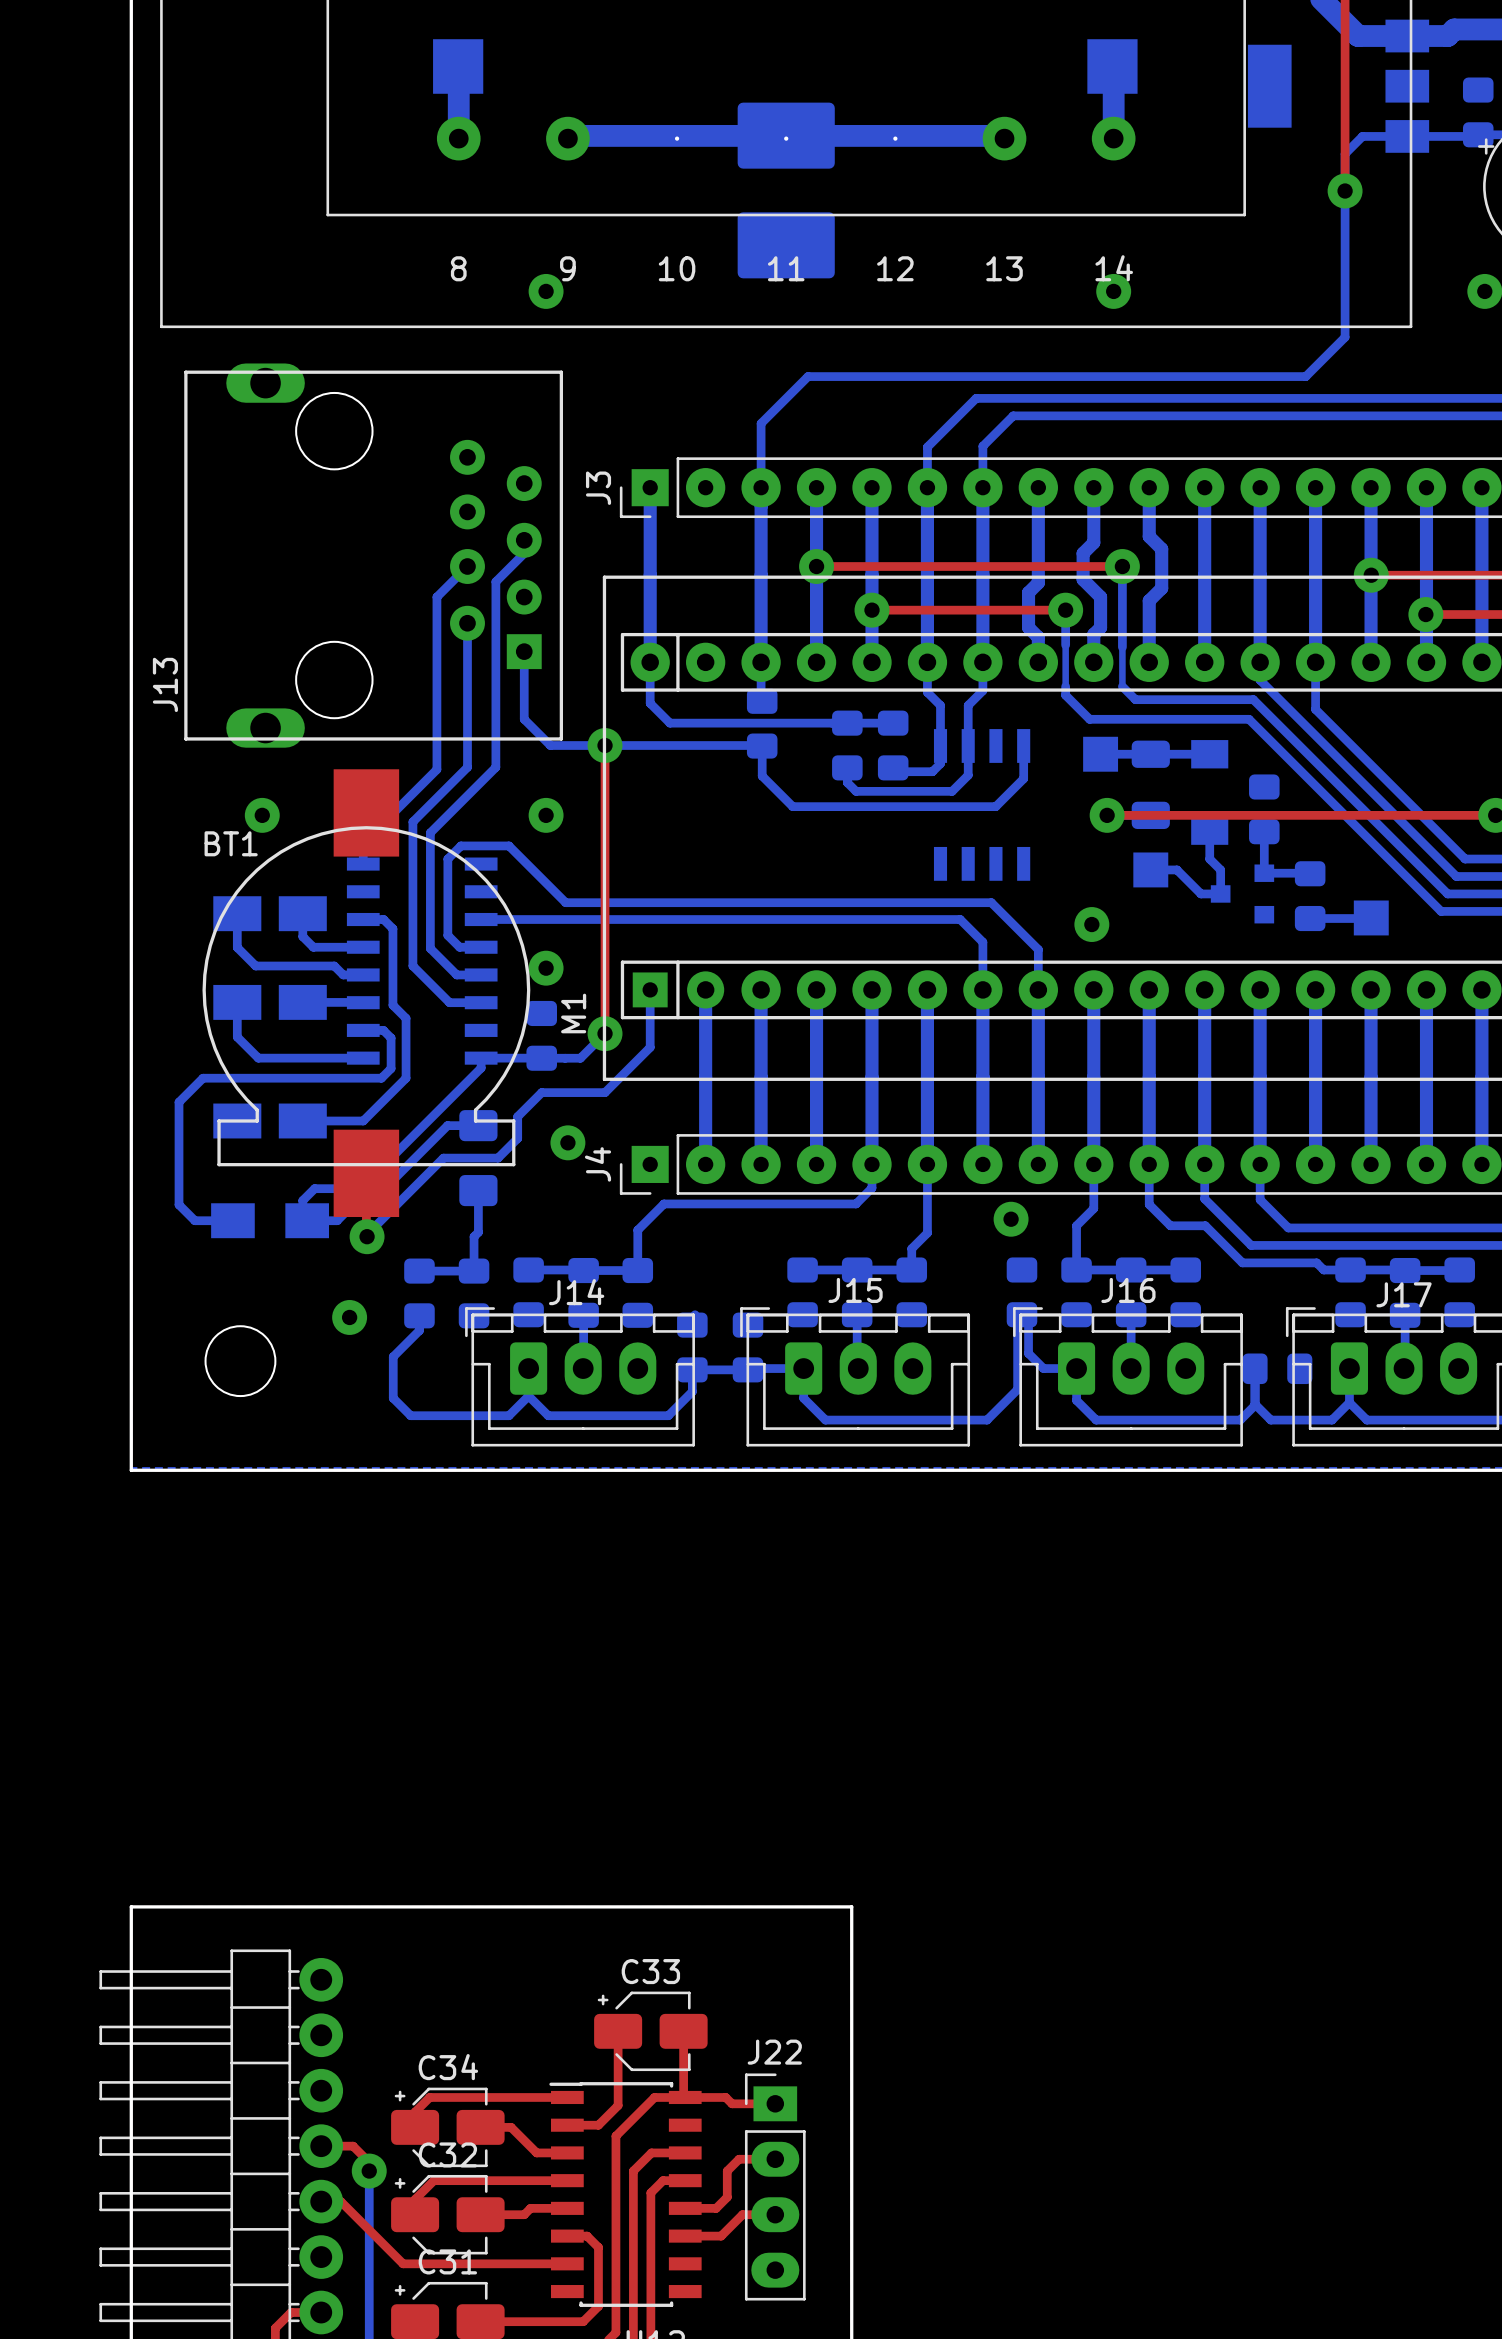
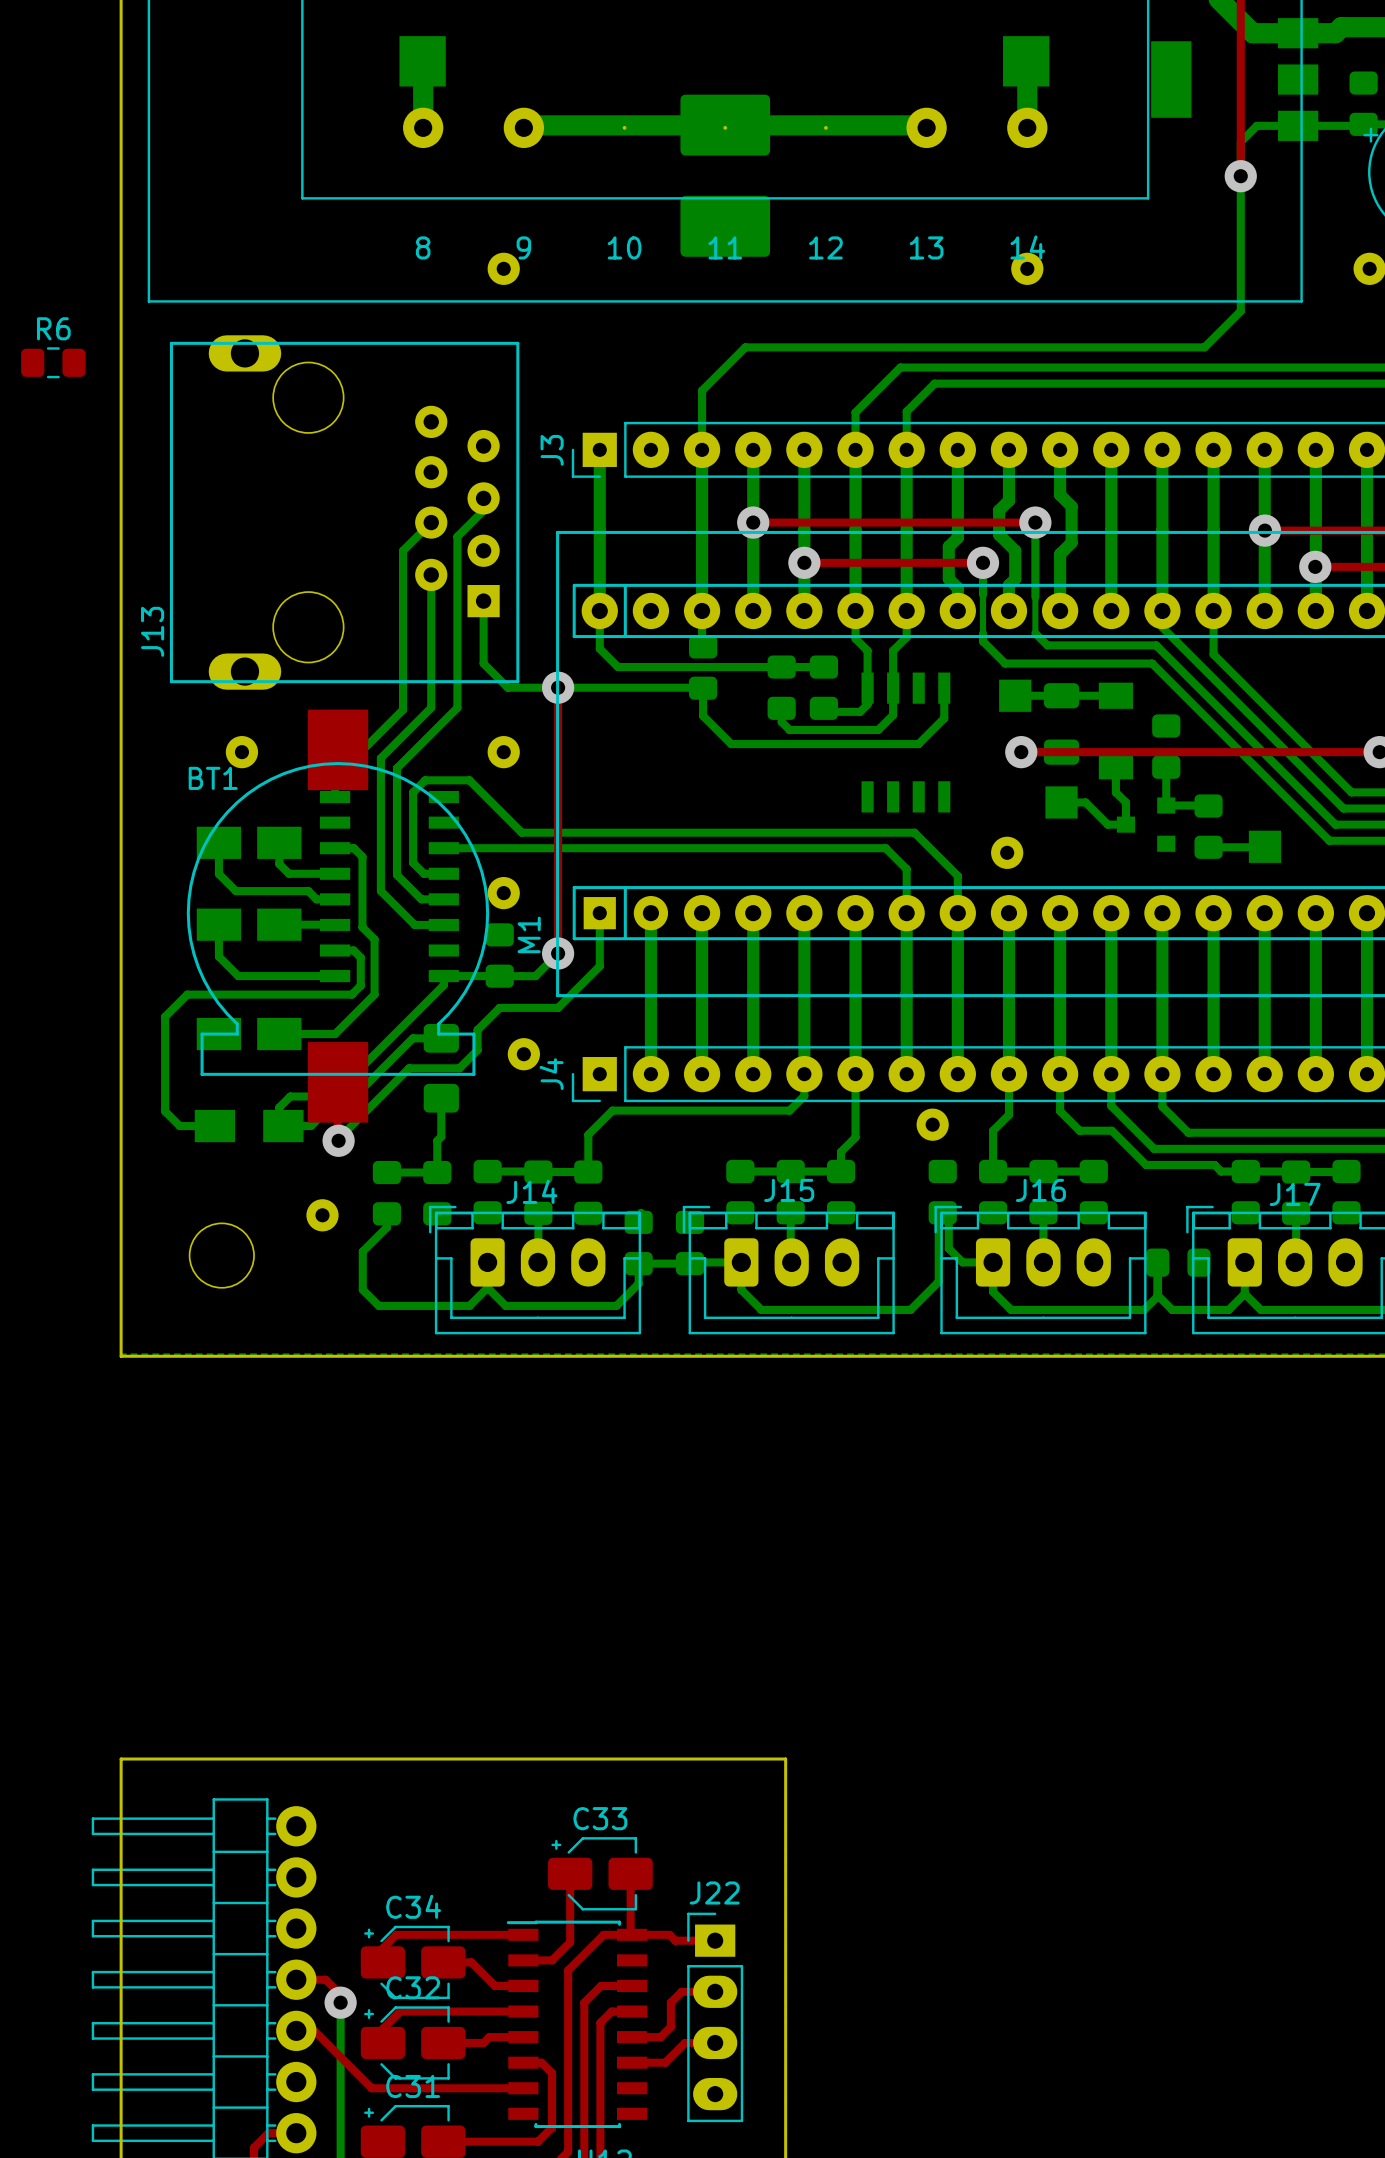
R6: none -> (53, 362)

